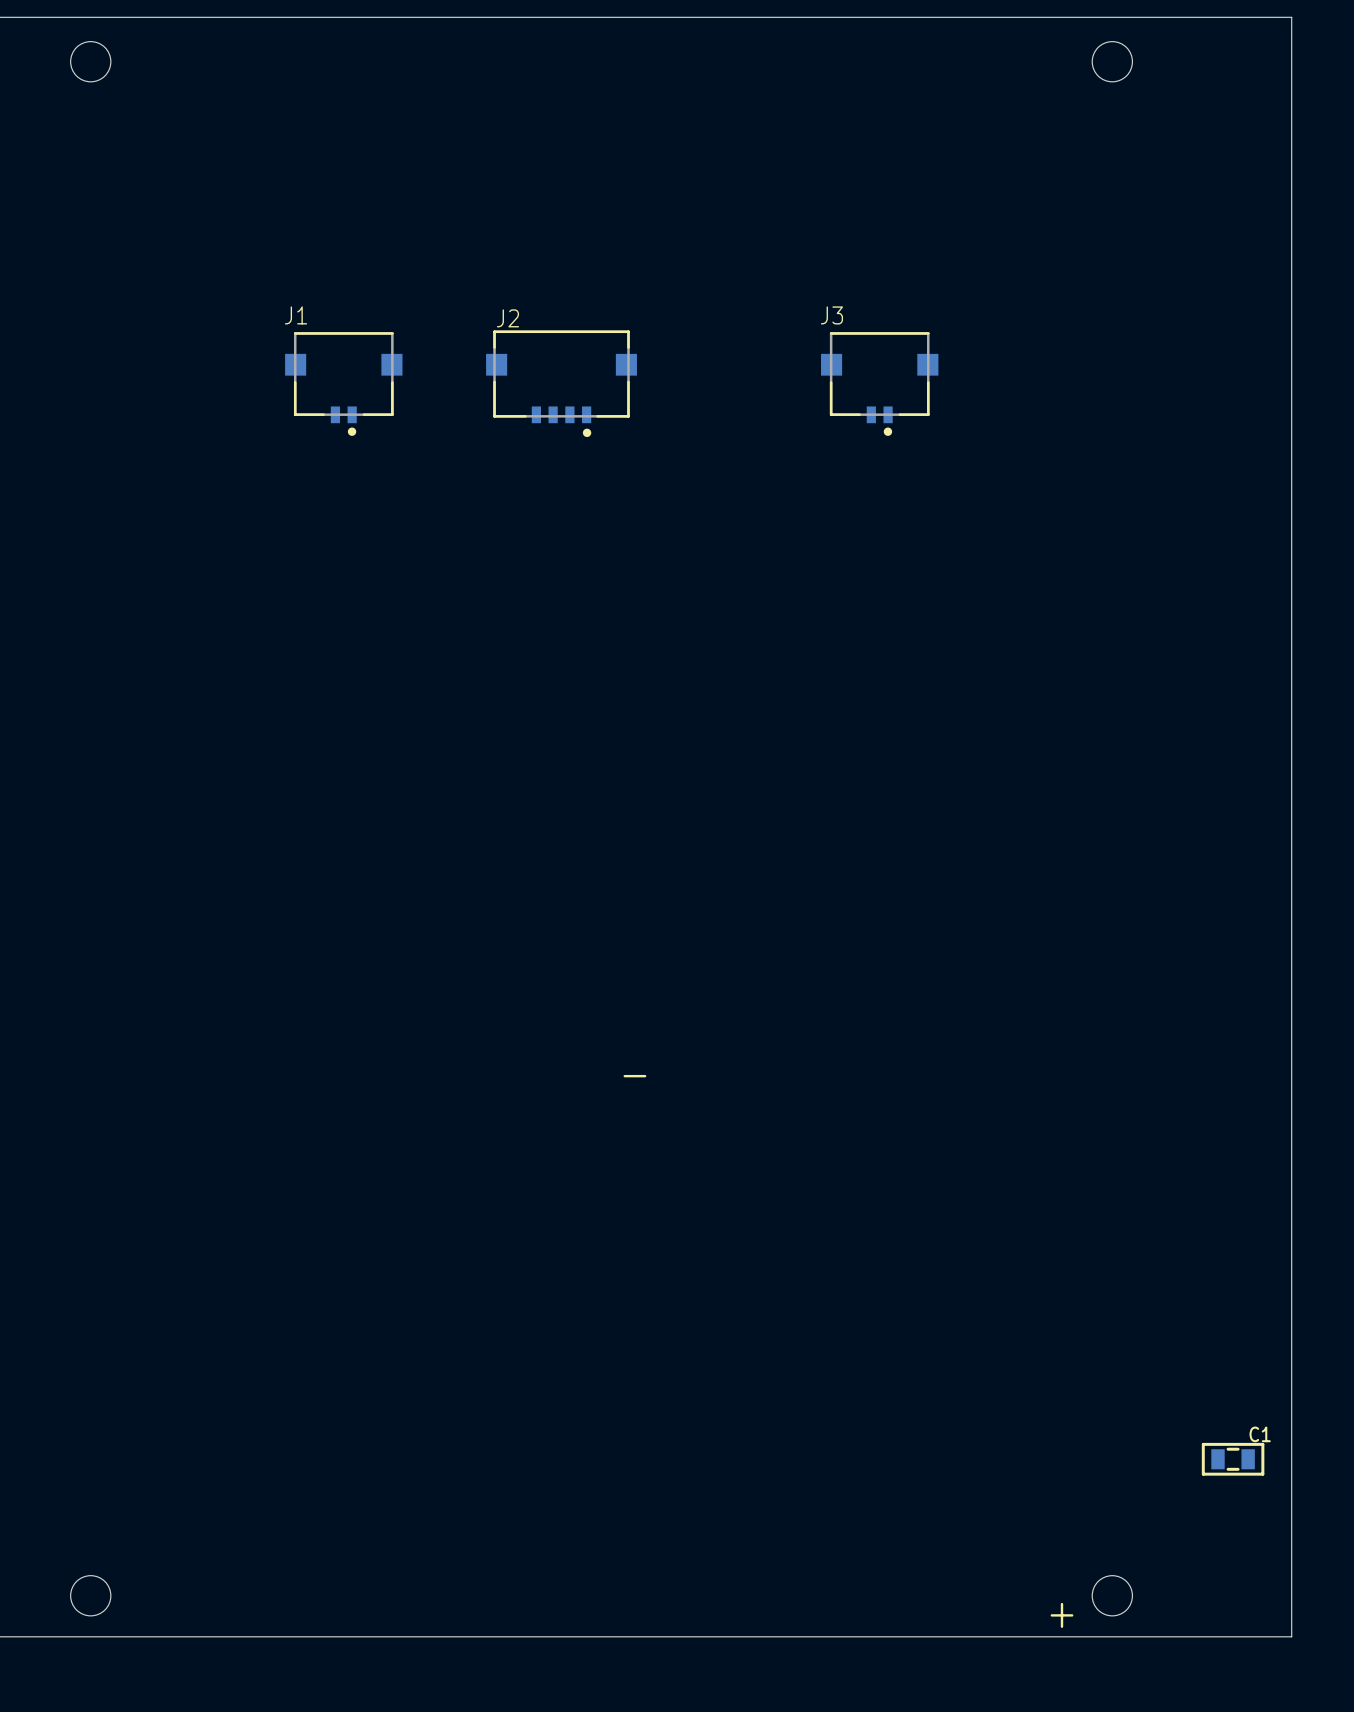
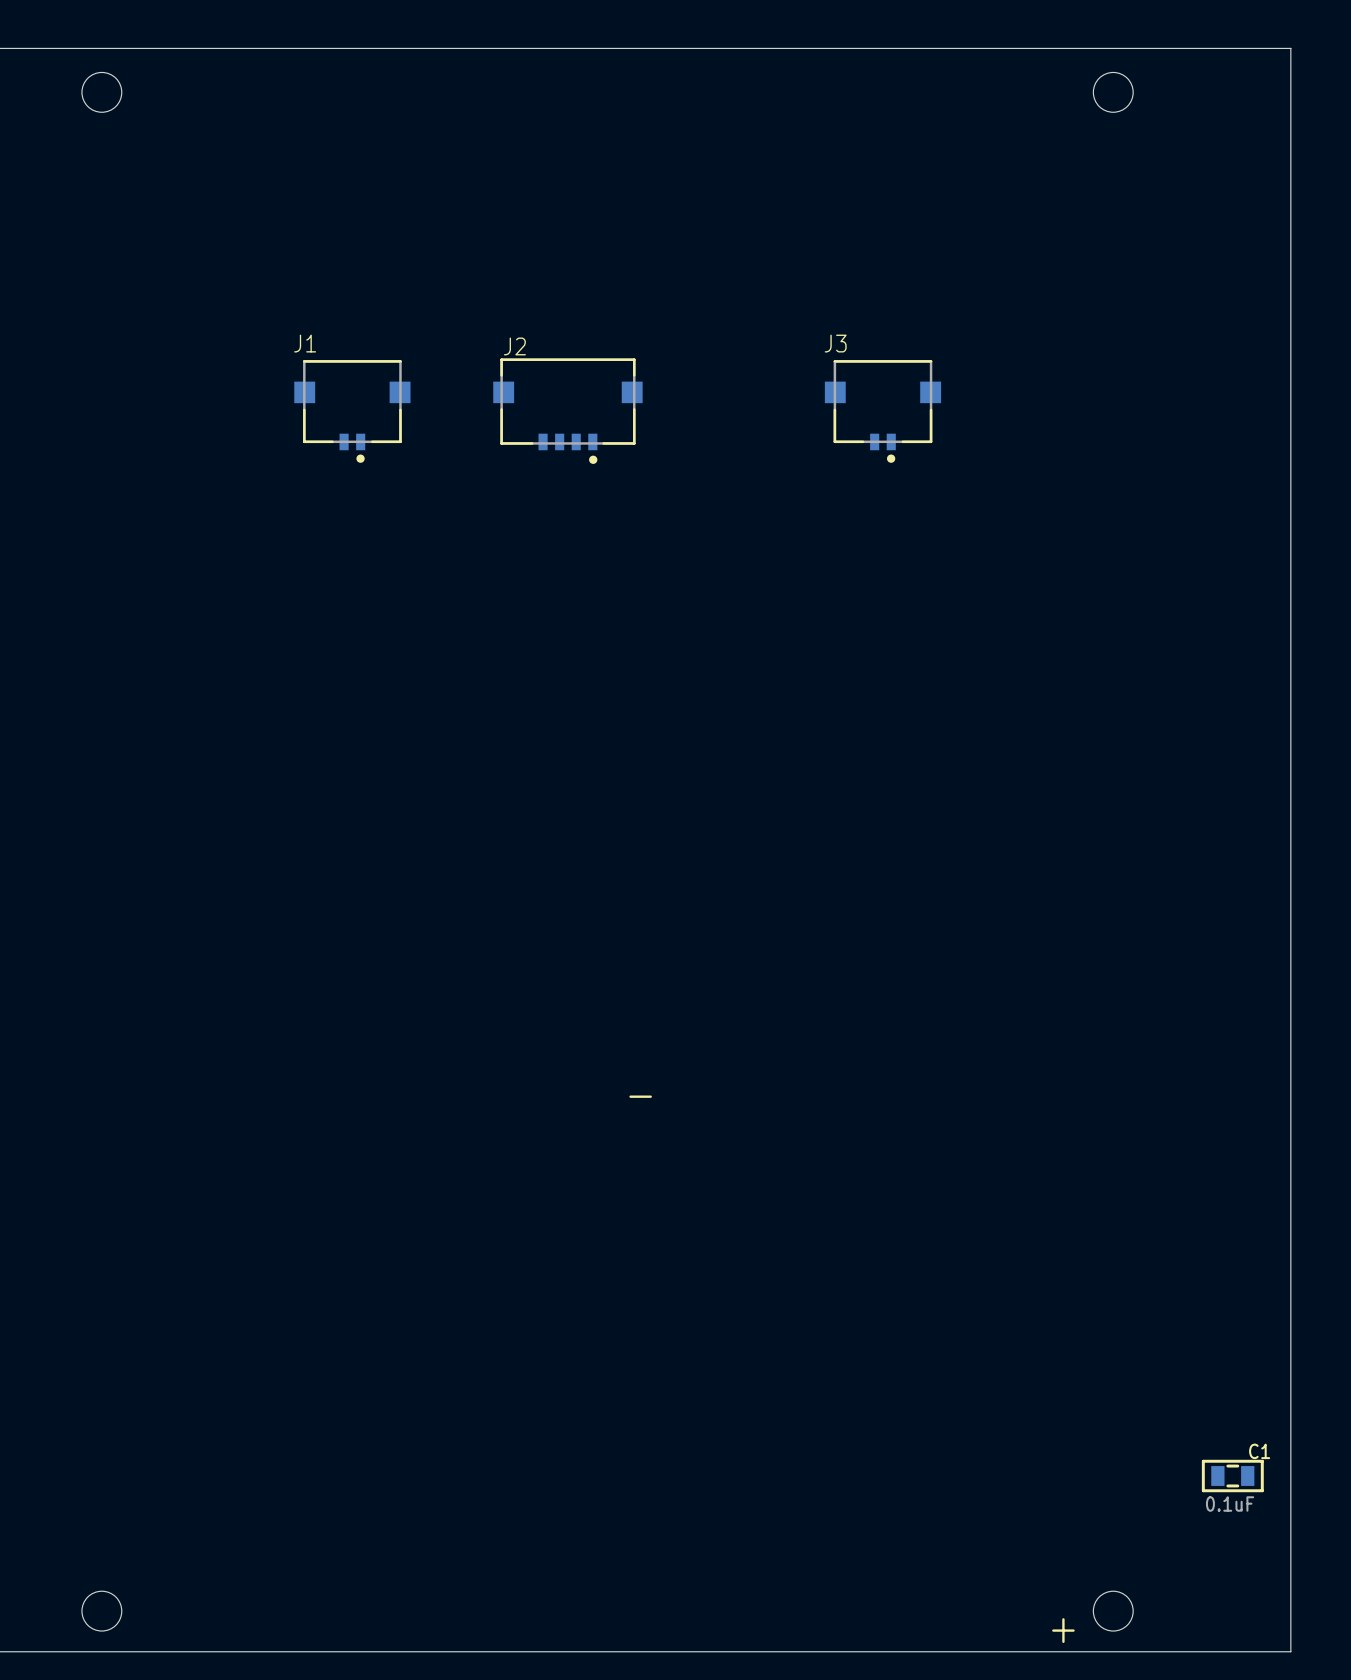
C1 value: none -> 0.1uF (1230, 1504)

